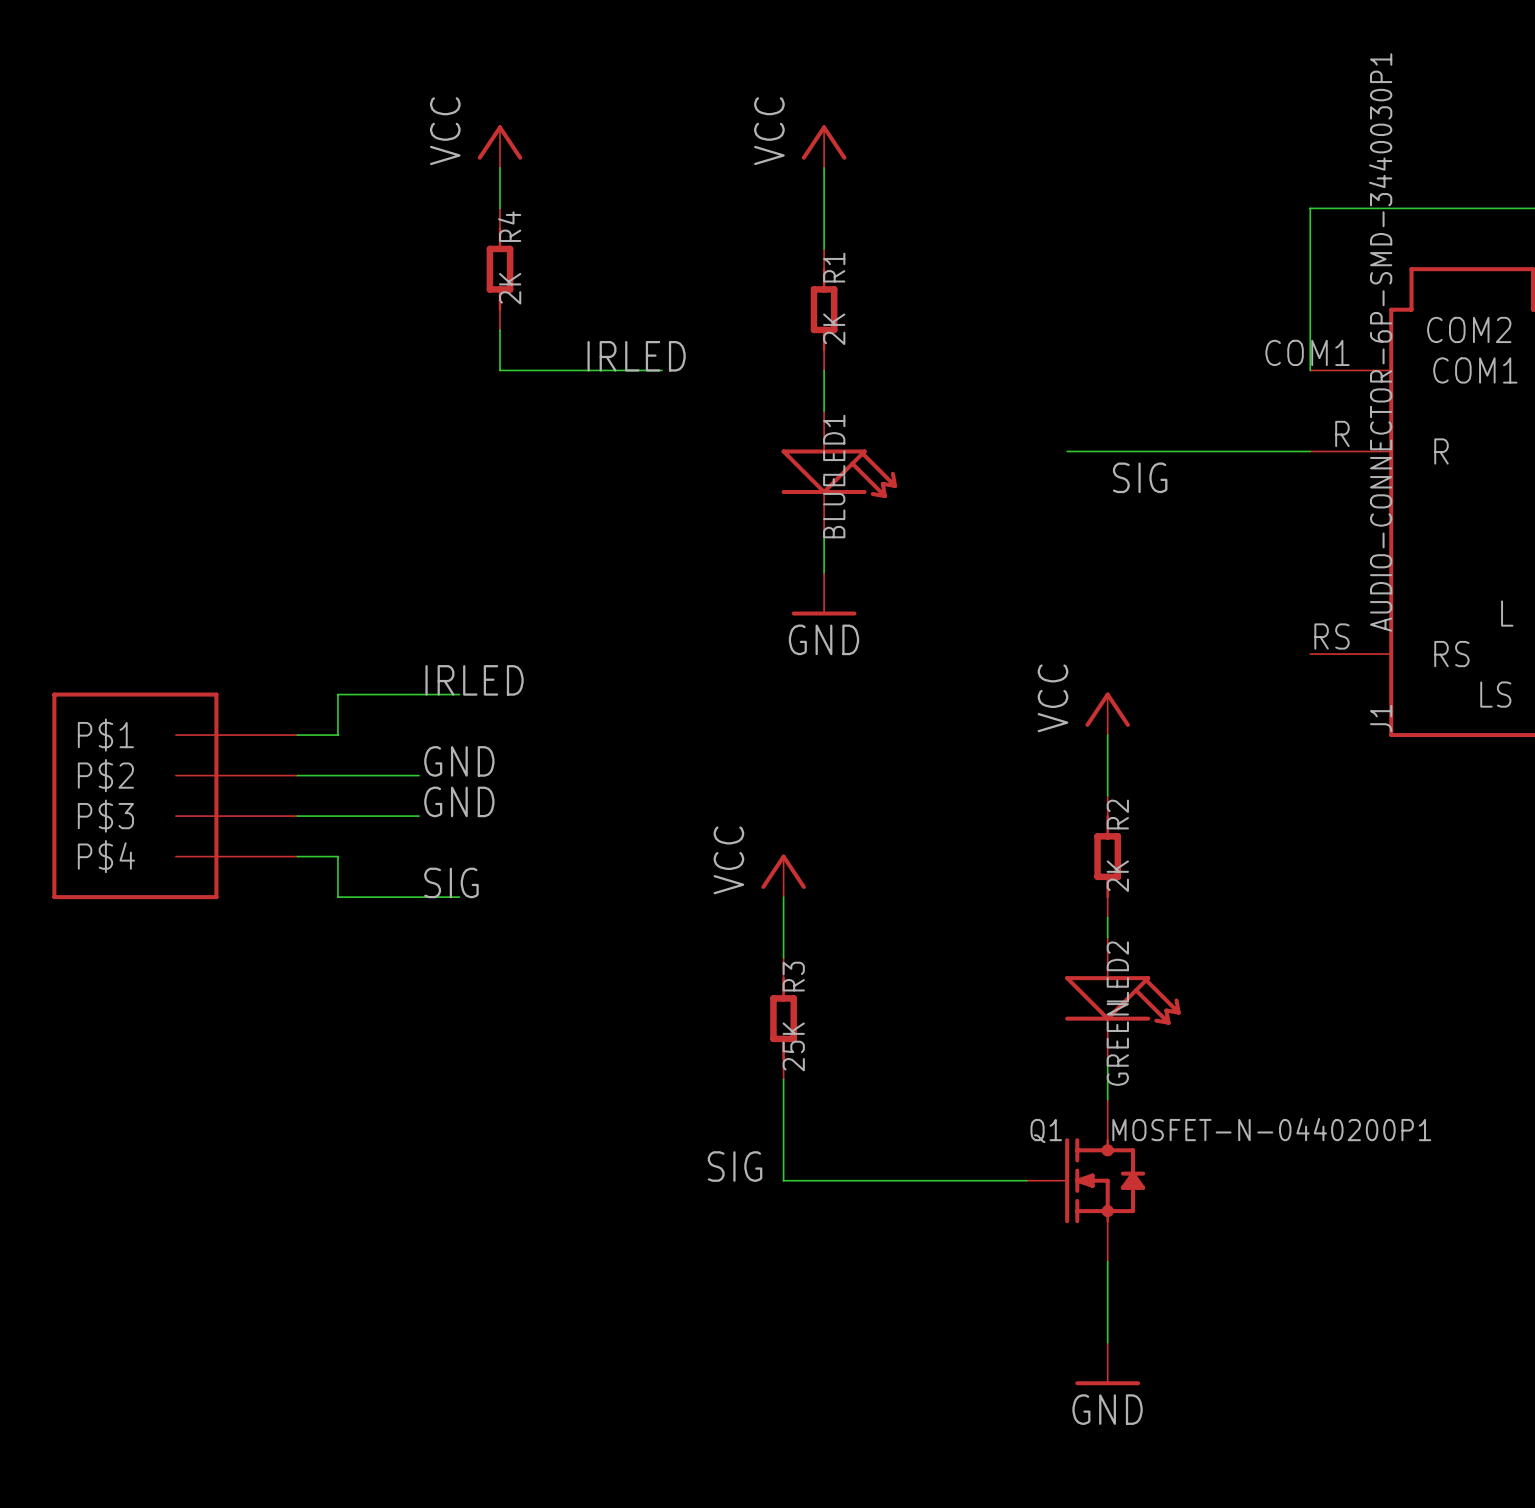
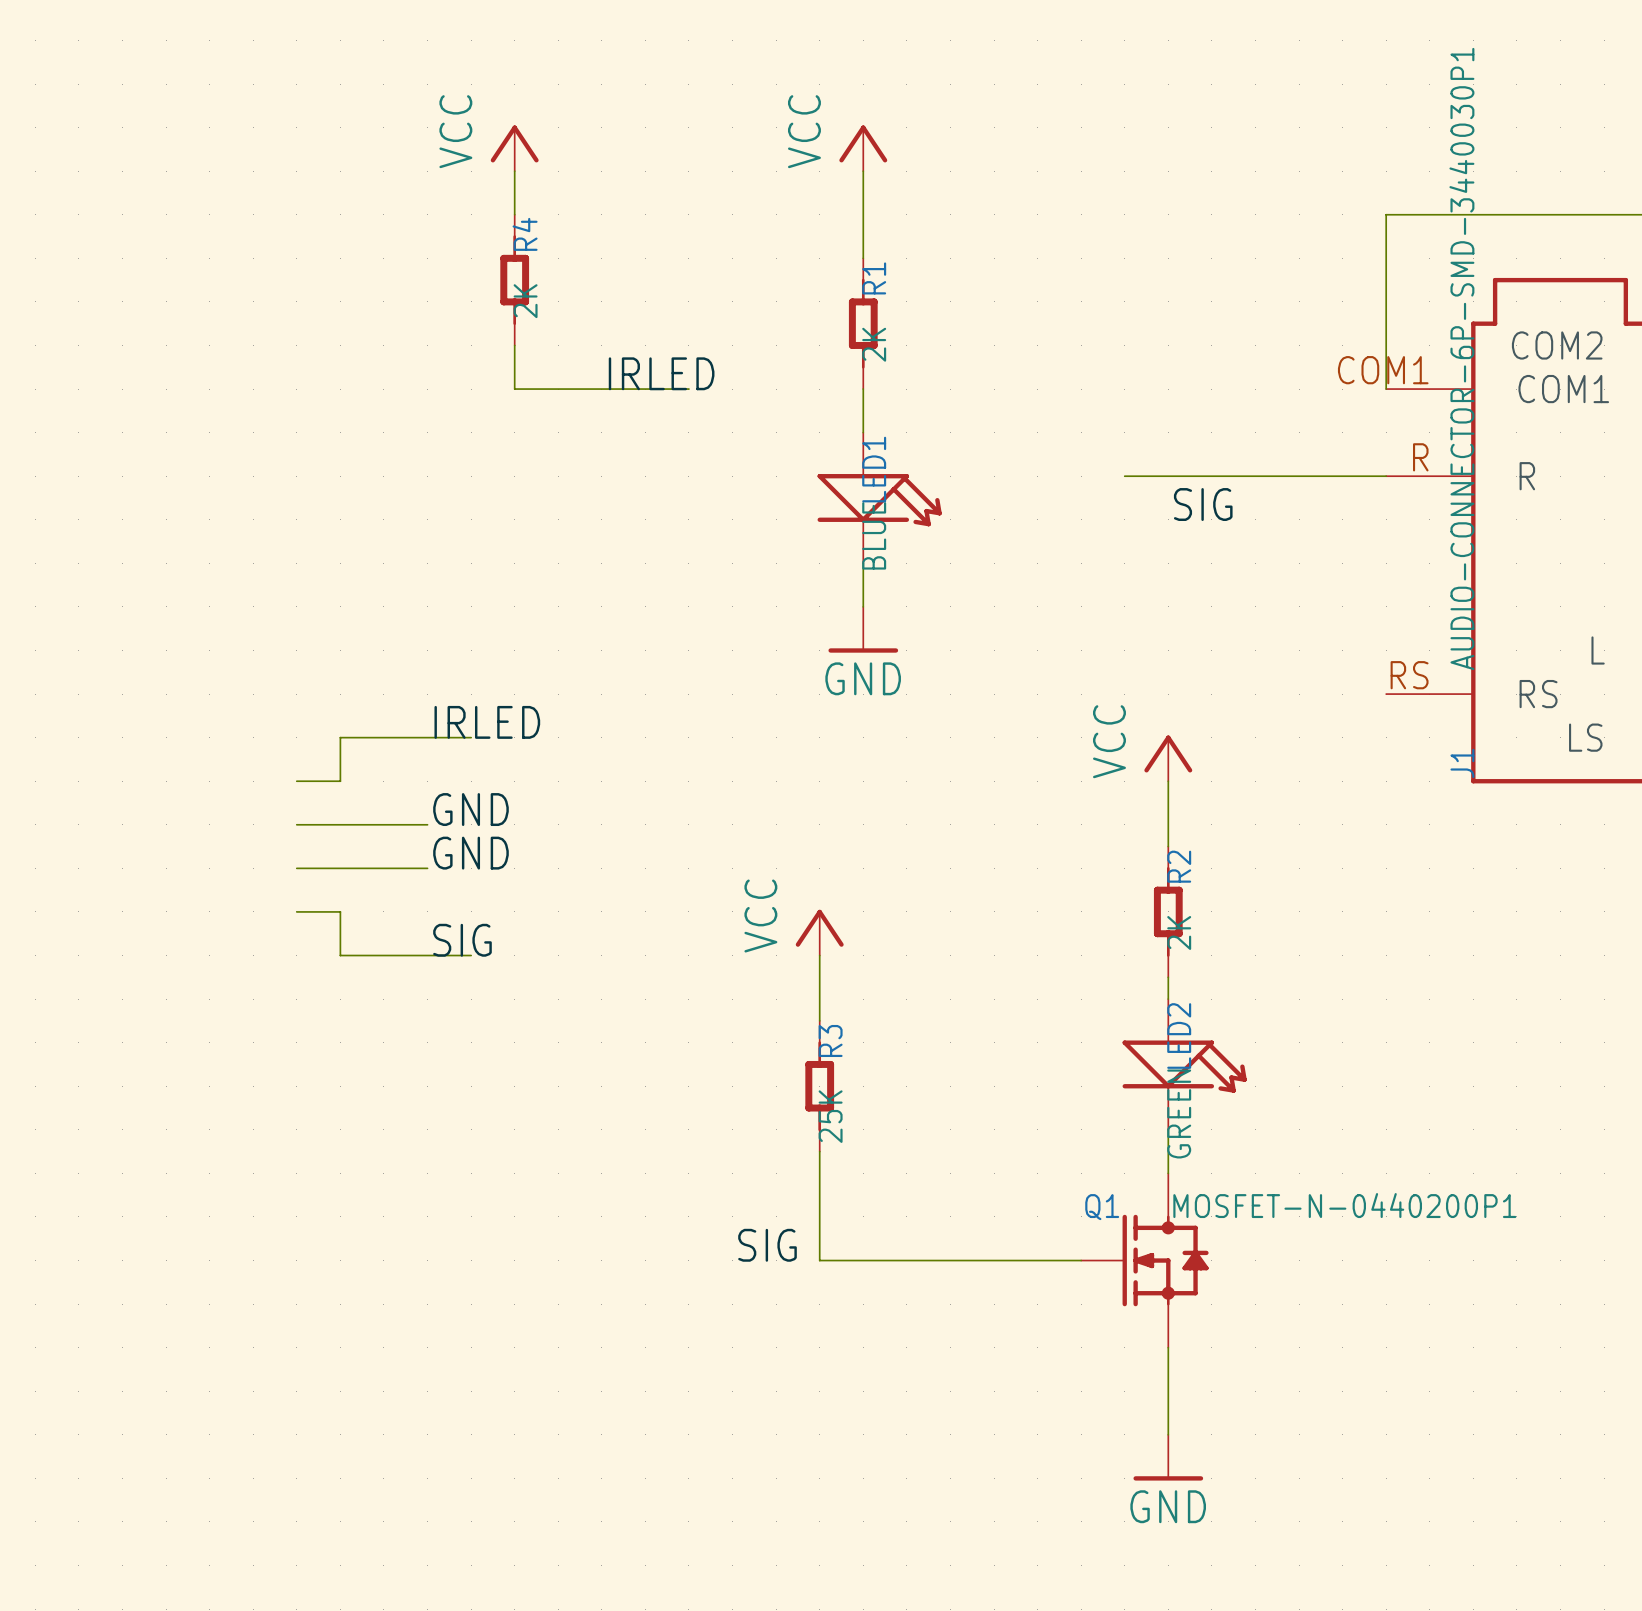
part: (174, 795) -> none

